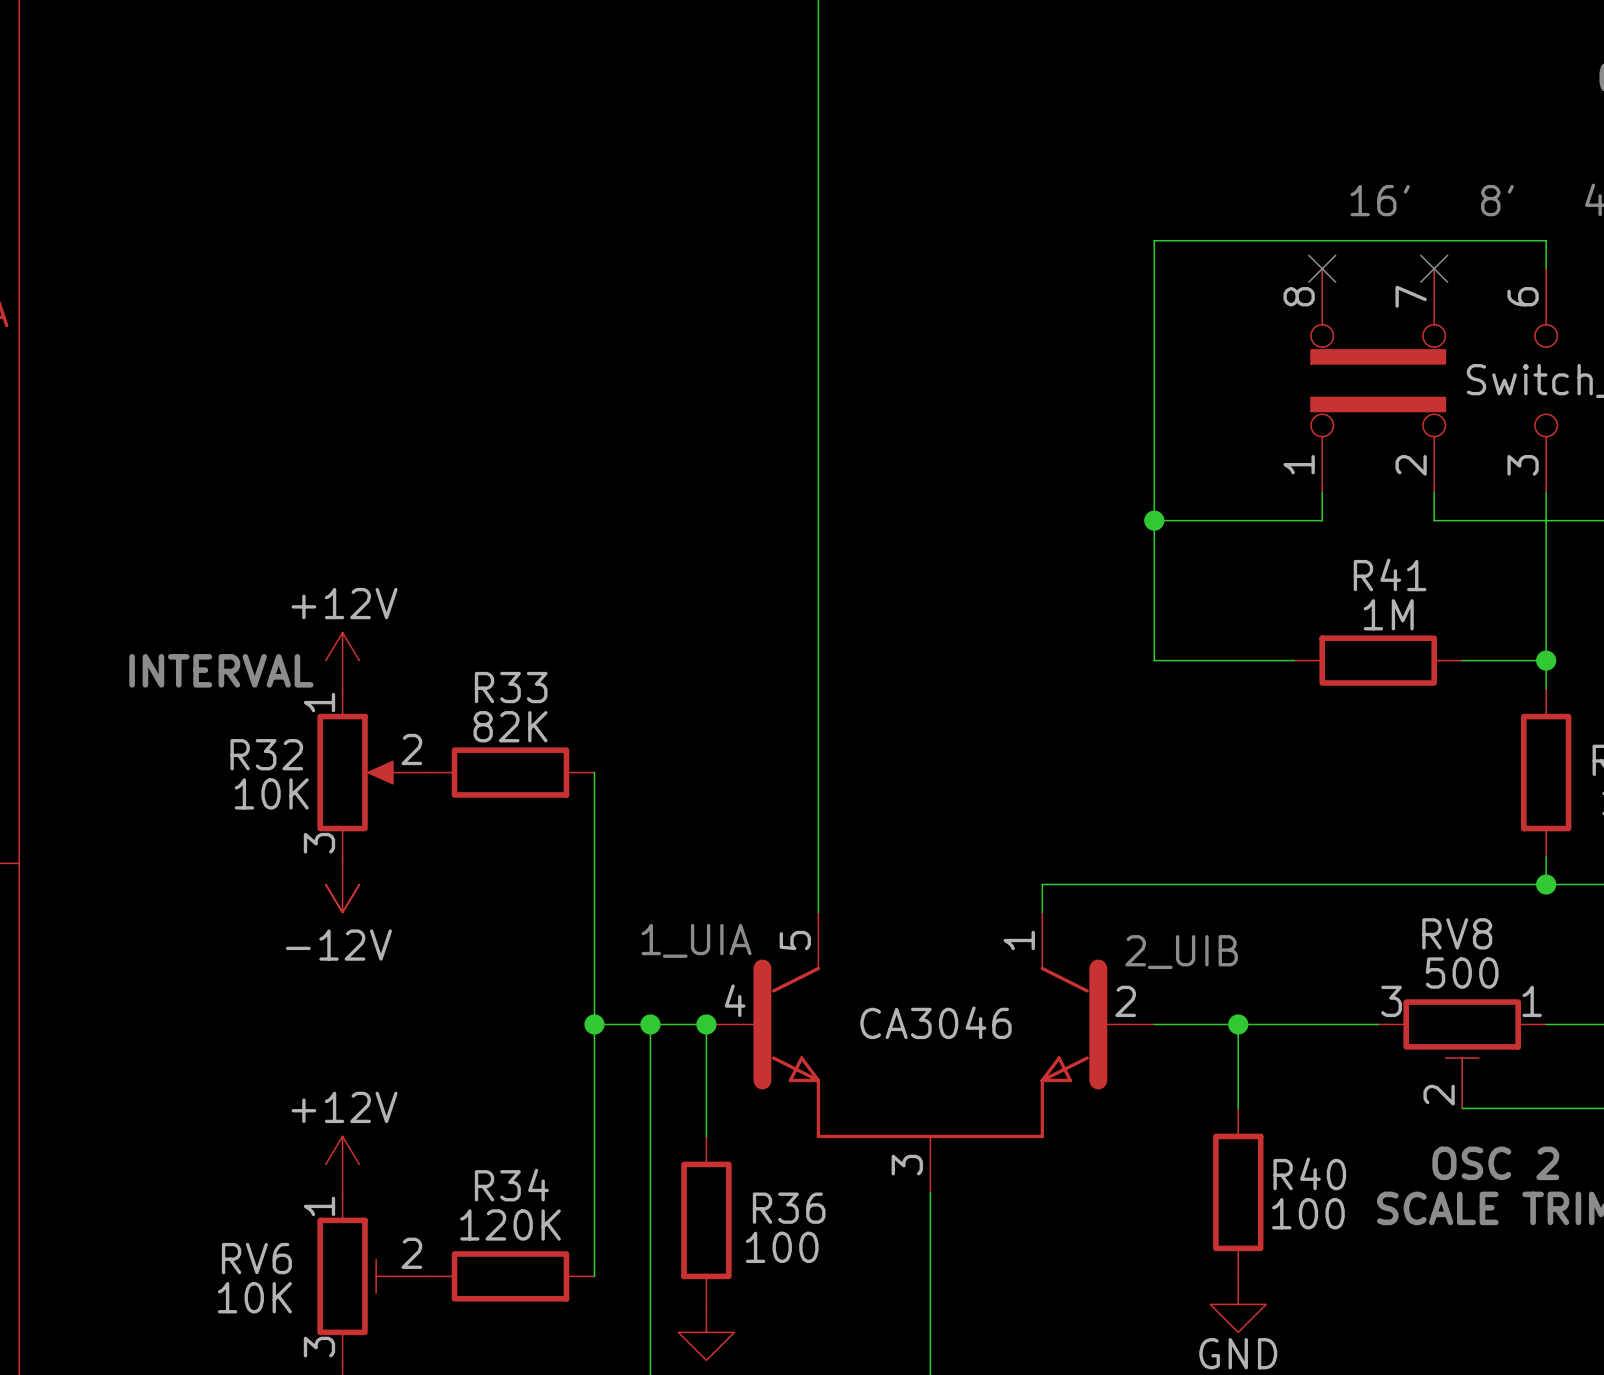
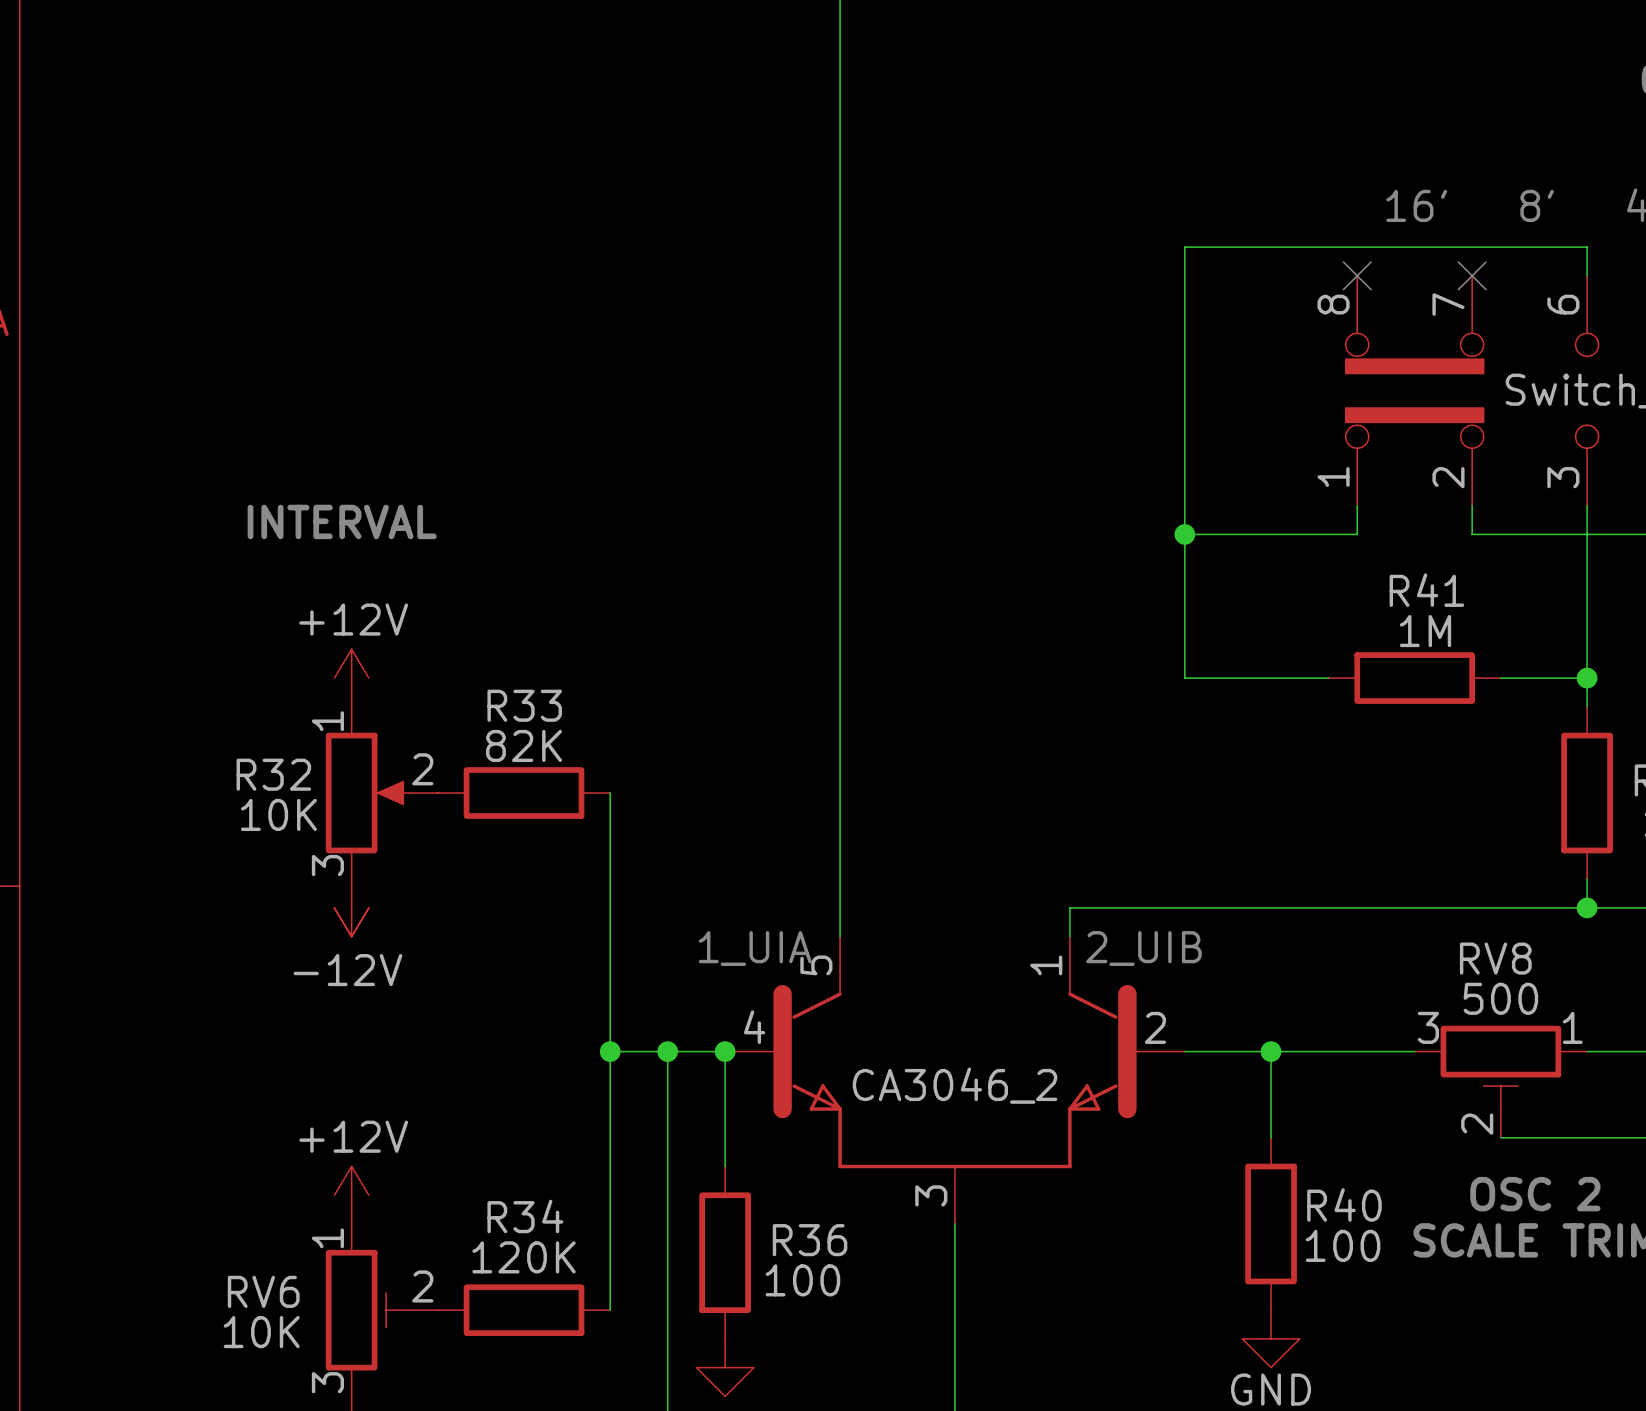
text position: INTERVAL (221, 670) -> INTERVAL (342, 521)
text position: 1_UIA (696, 940) -> 1_UIA (755, 948)
text position: 2_UIB (1181, 952) -> 2_UIB (1143, 948)
CA3046 name: CA3046 (935, 1022) -> CA3046_2 (954, 1085)

